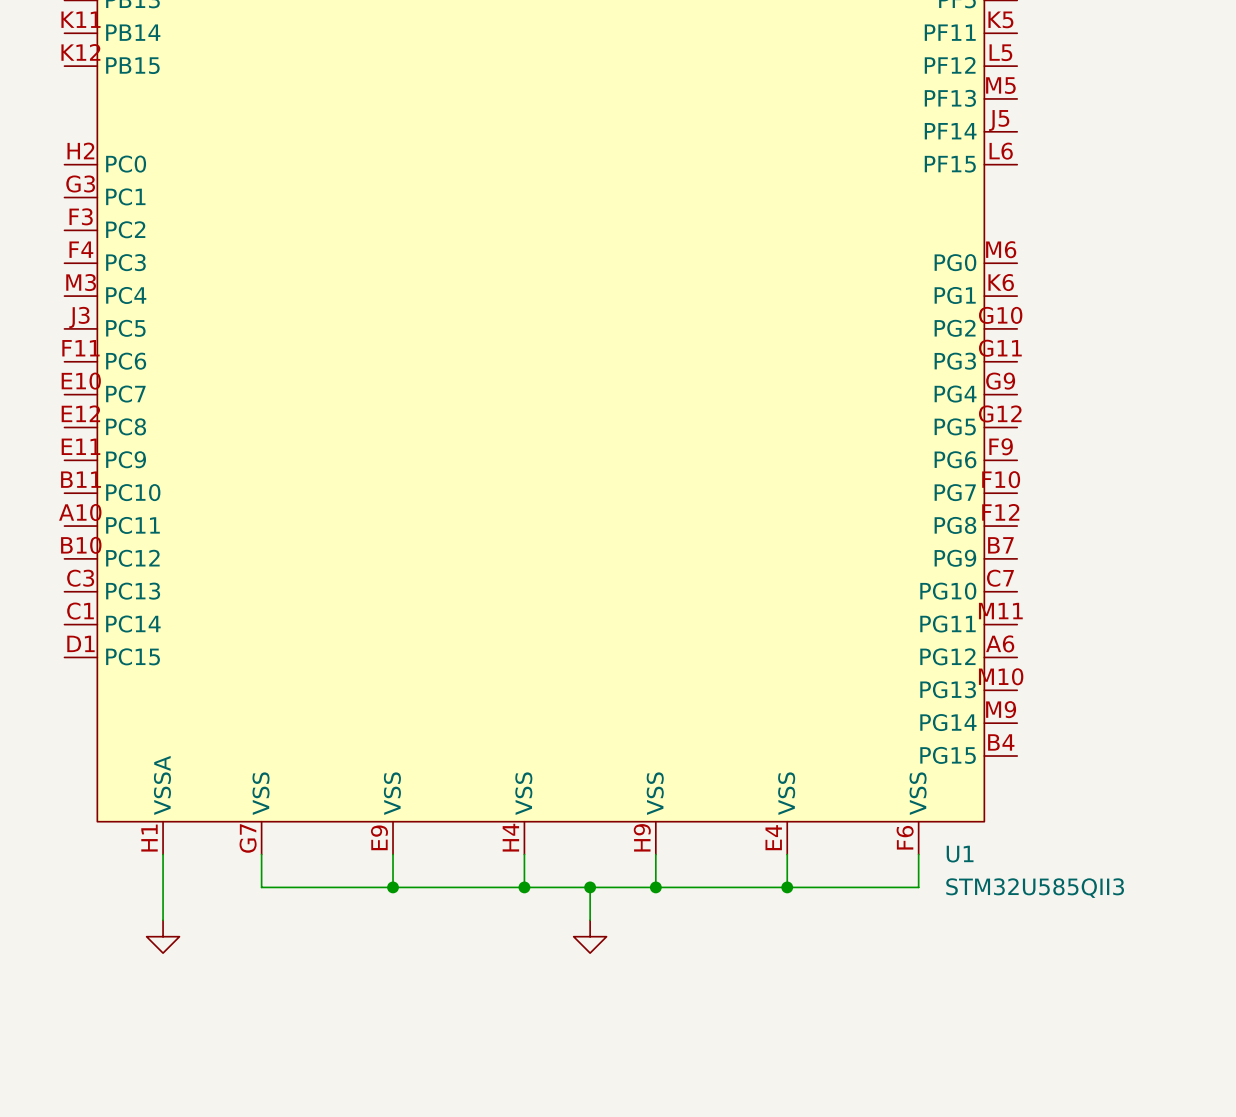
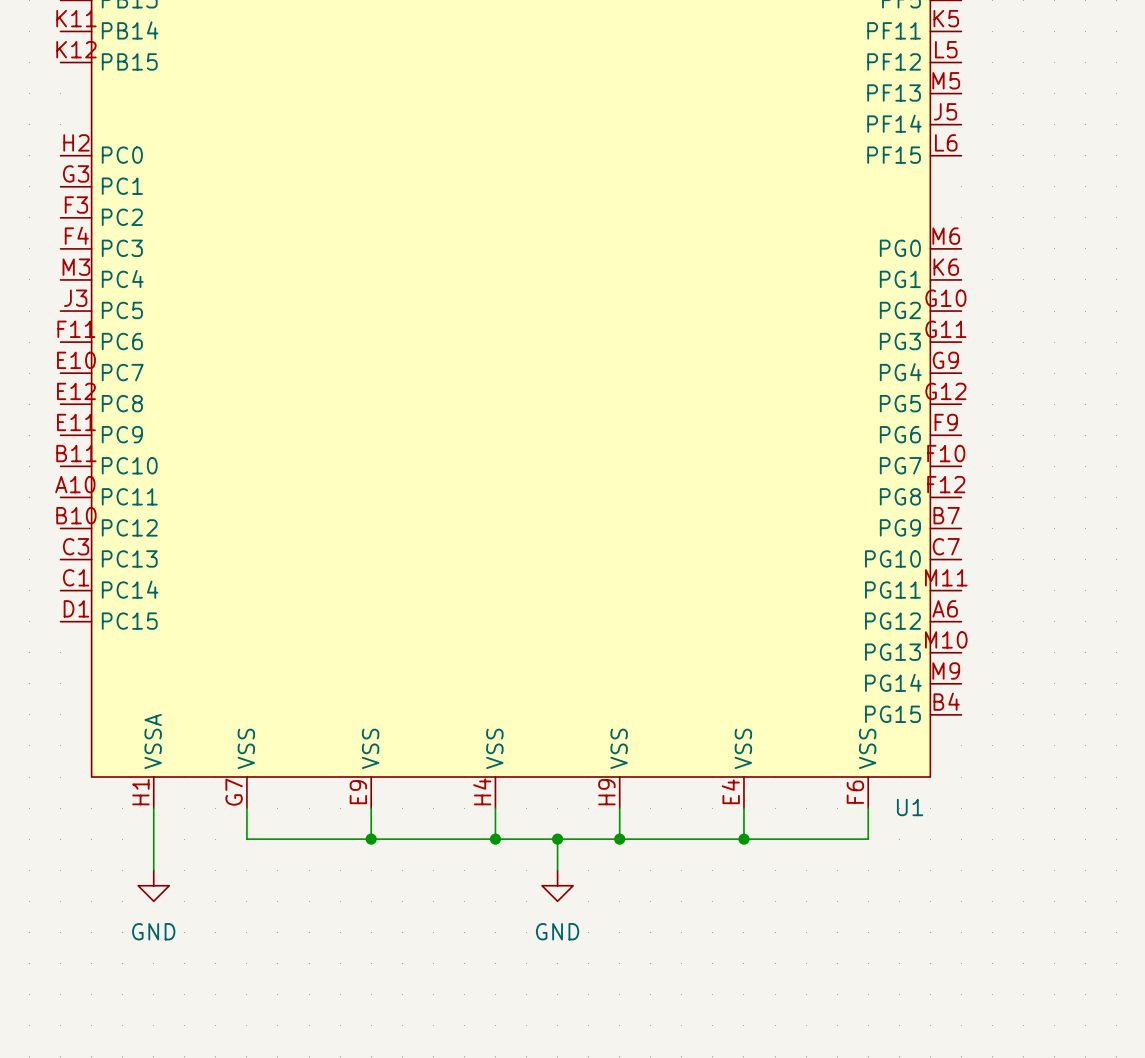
U1 value: STM32U585QII3 (1035, 888) -> none
power symbol text: none -> GND (153, 931)
power symbol text: none -> GND (557, 931)

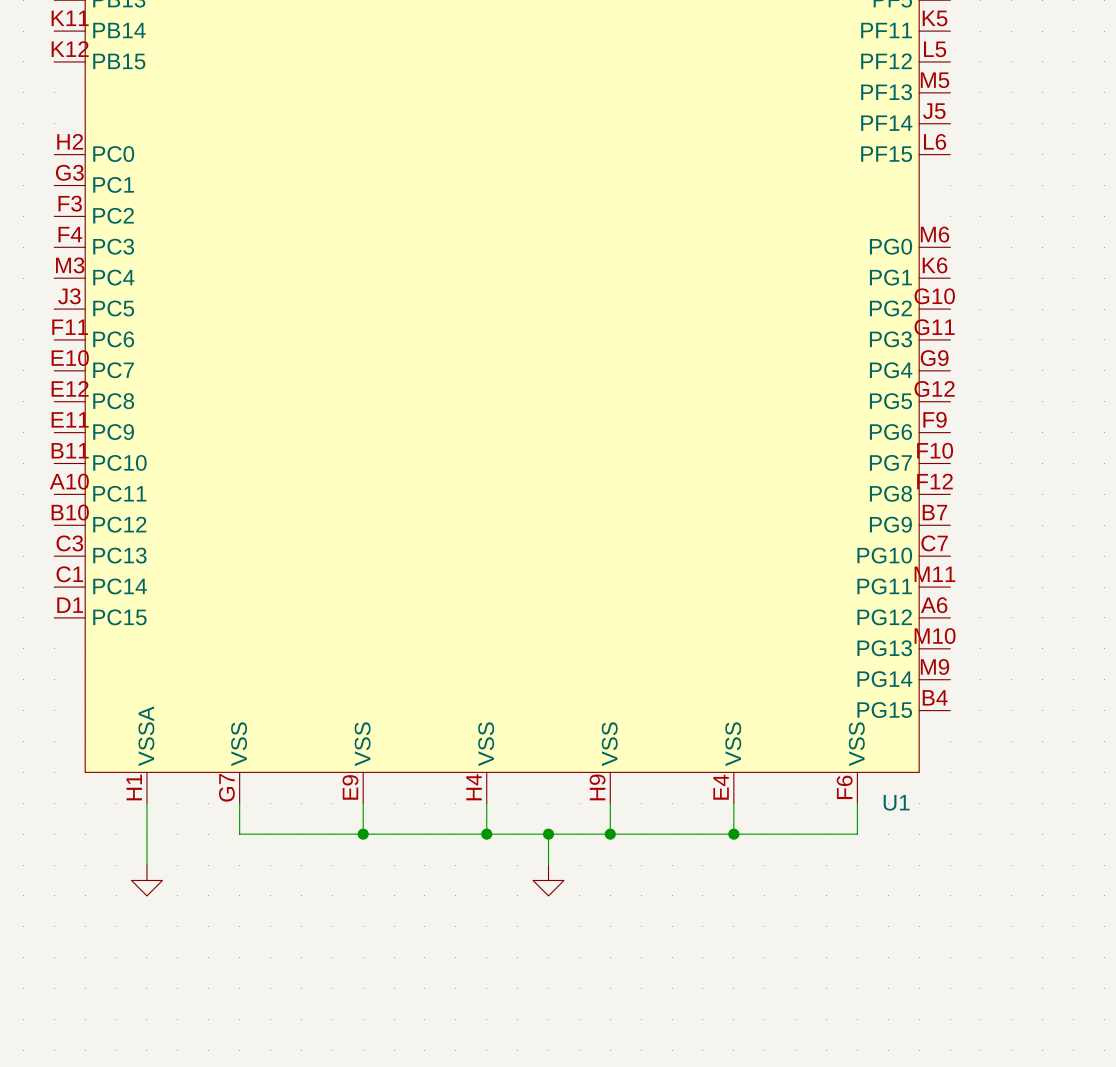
power symbol text: GND (153, 931) -> none
power symbol text: GND (557, 931) -> none

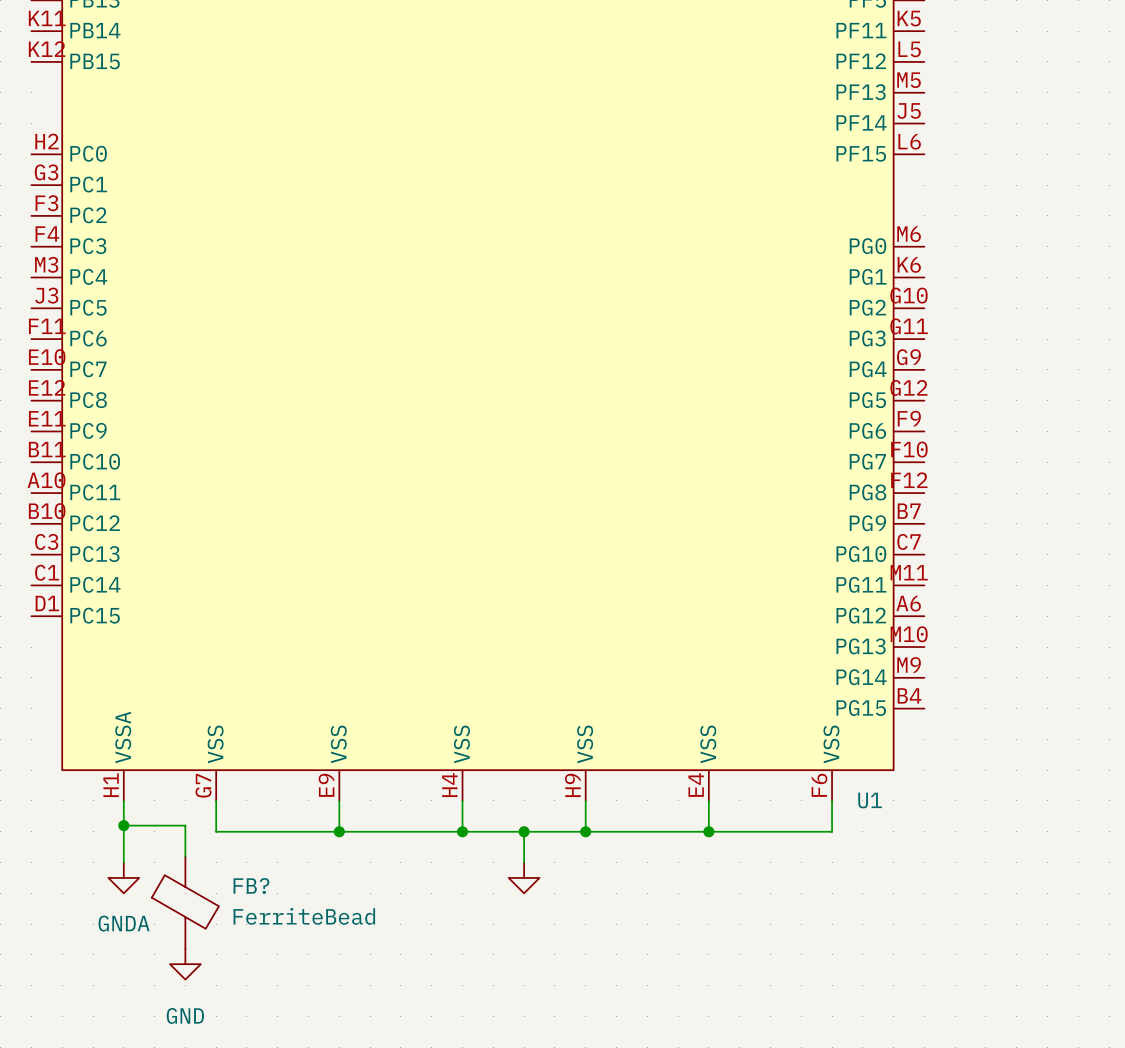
wire: none -> (123, 825) (185, 825) (185, 856)
junction: none -> (123, 825)
FB?: none -> FerriteBead (185, 902)
power symbol text: none -> GNDA (124, 923)
power symbol: none -> GND (185, 964)

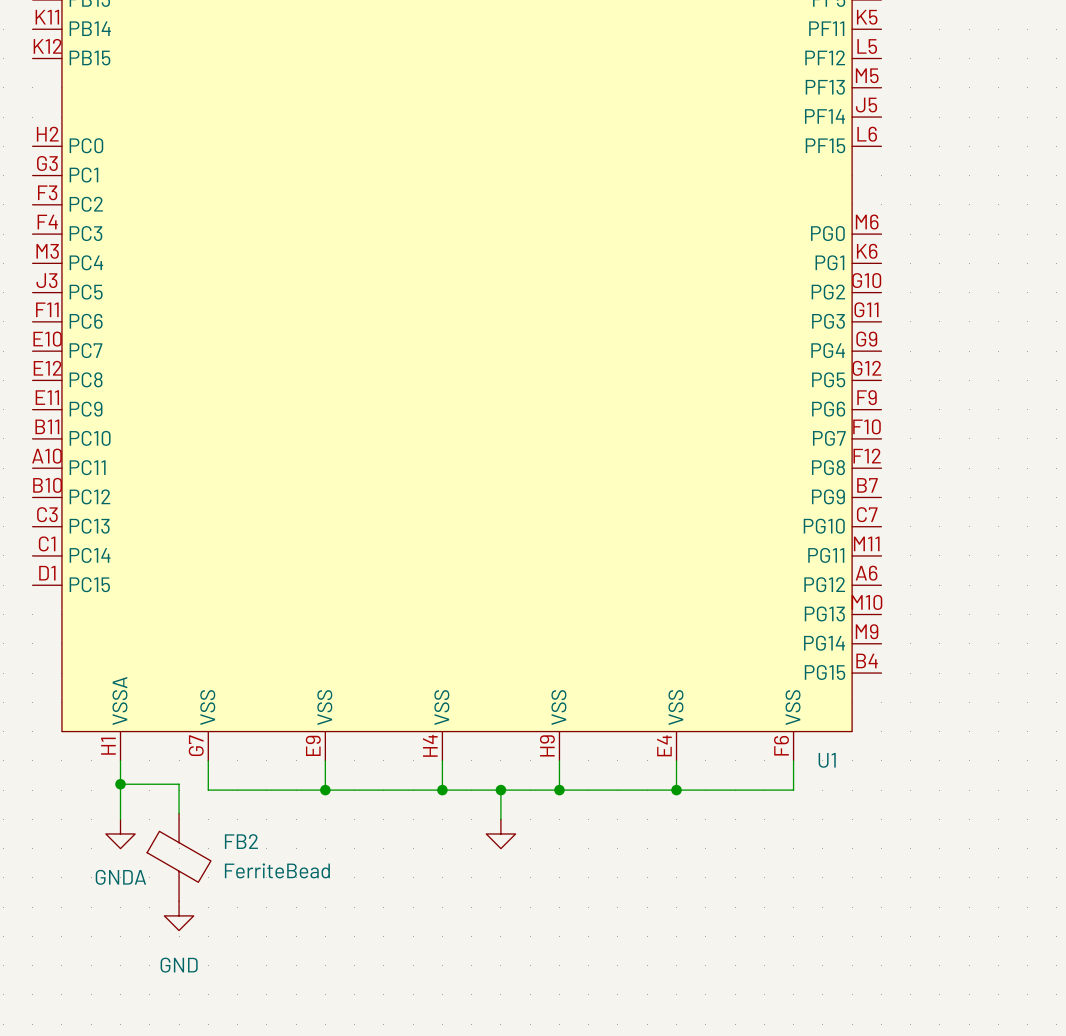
FB? name: FB? (251, 885) -> FB2 (241, 841)

